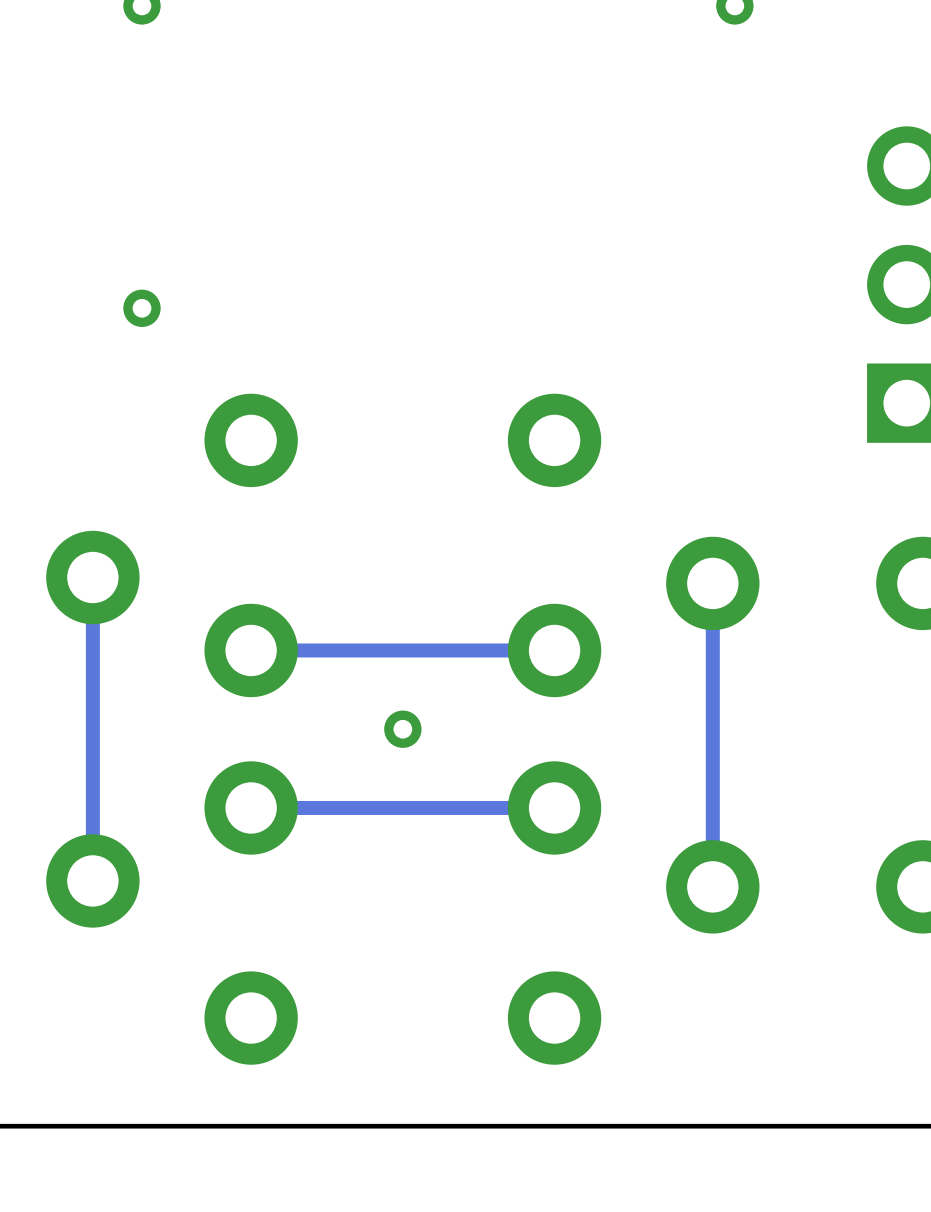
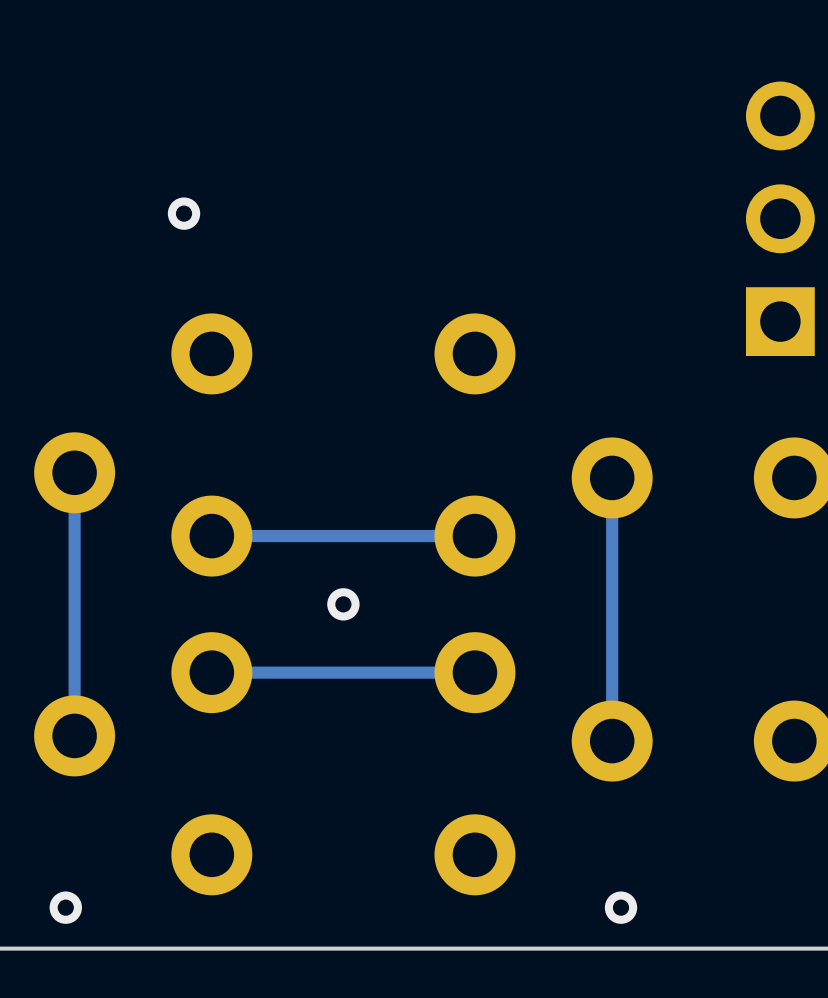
via position: (141, 308) -> (184, 213)
via: none -> (65, 907)
via: none -> (621, 907)

